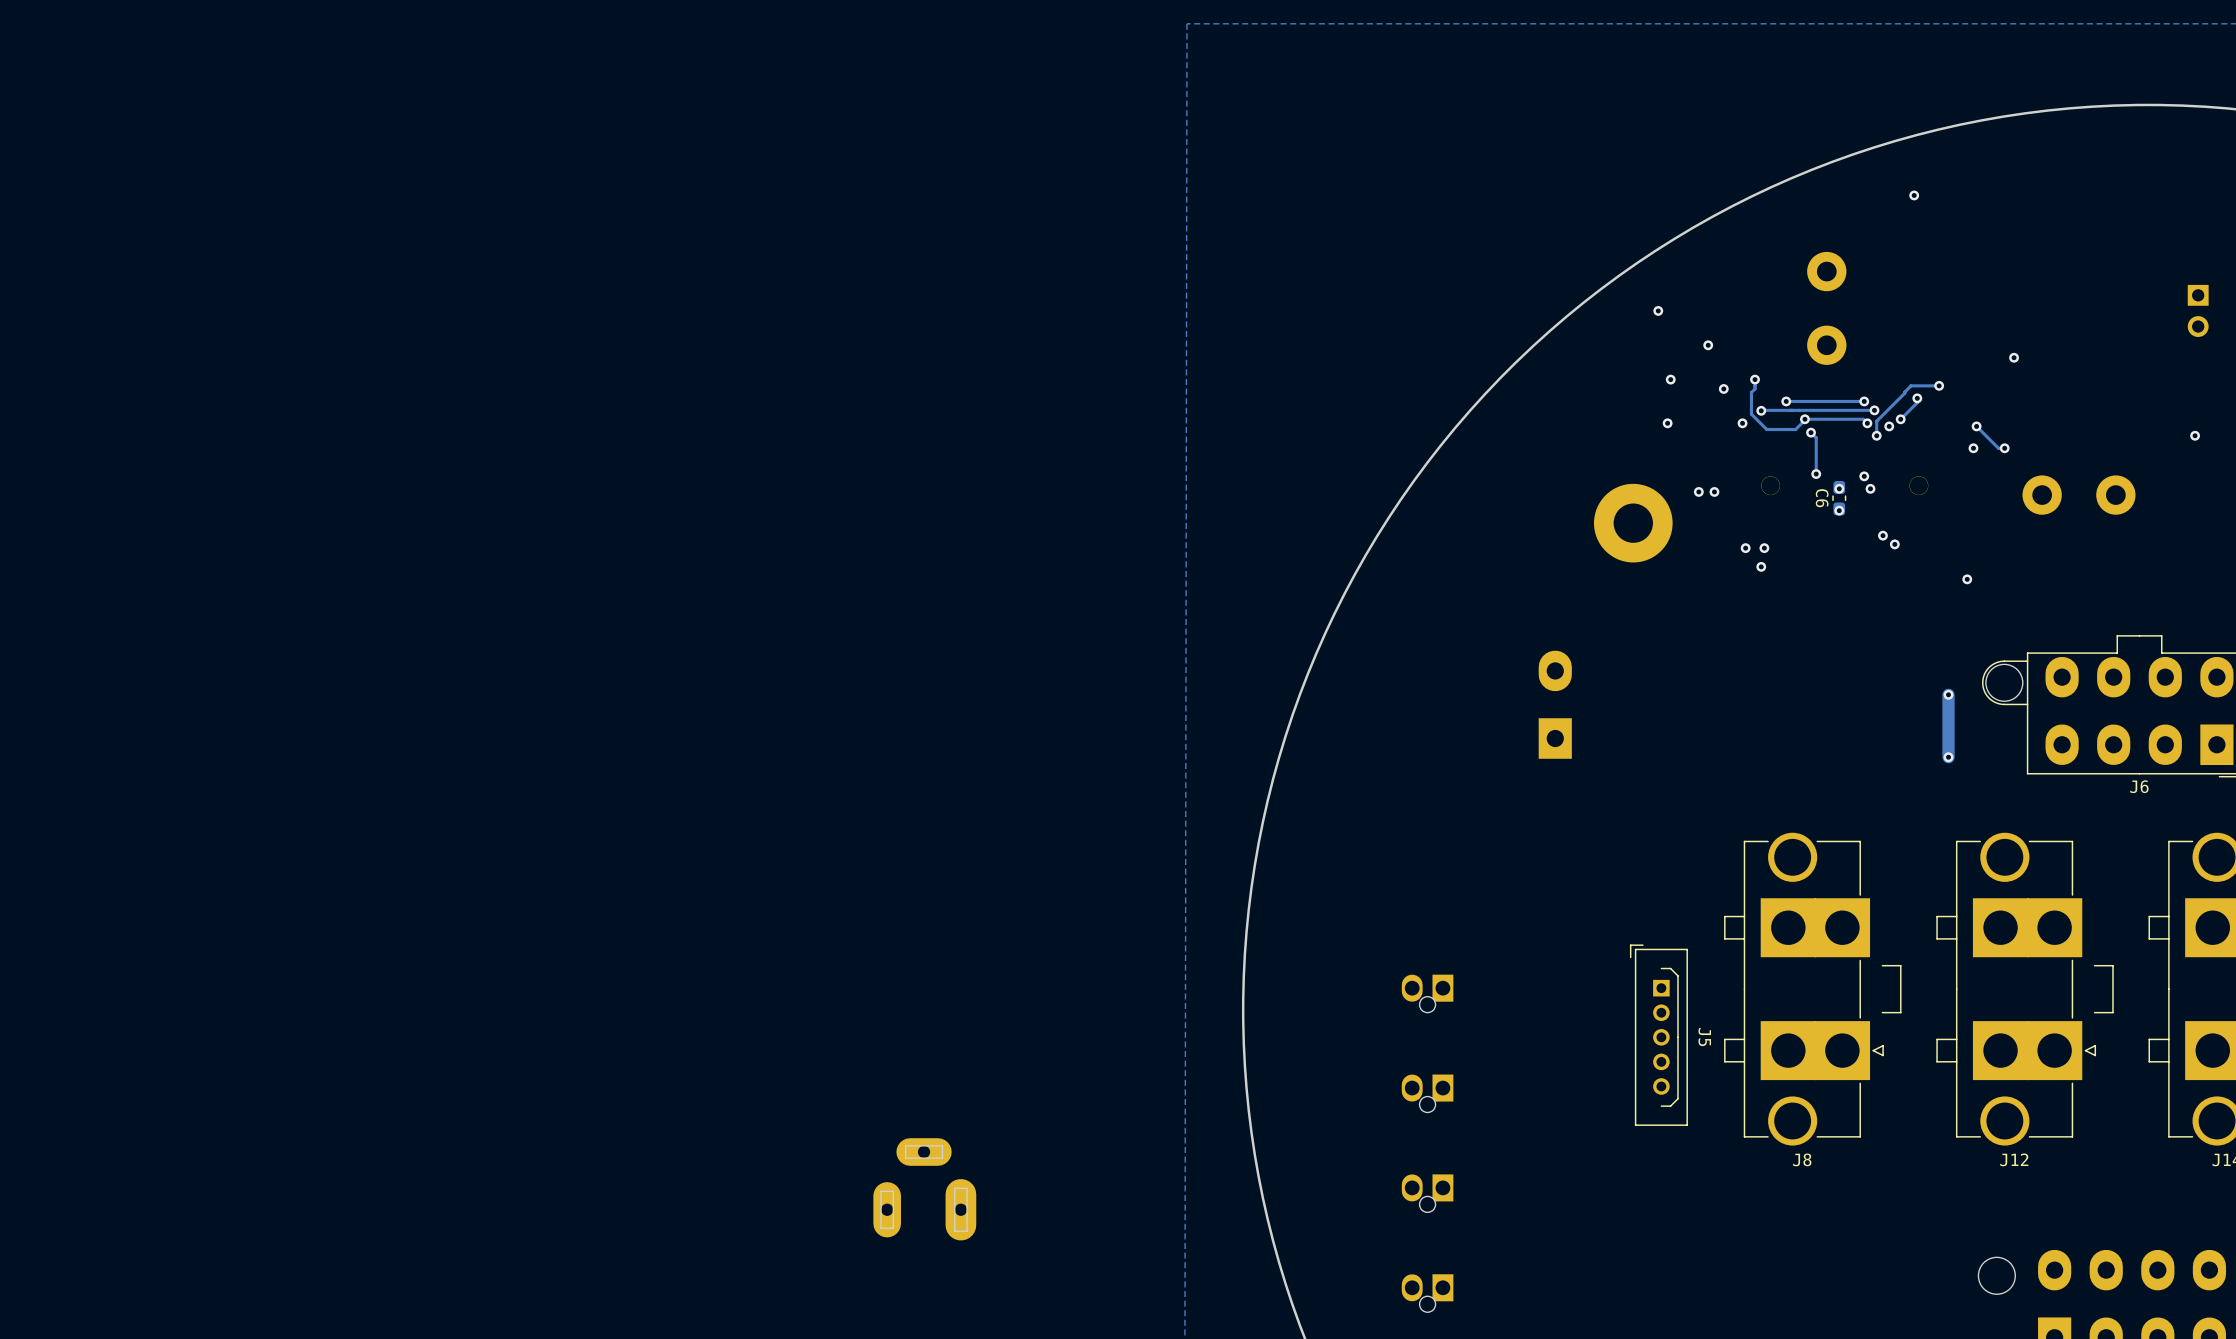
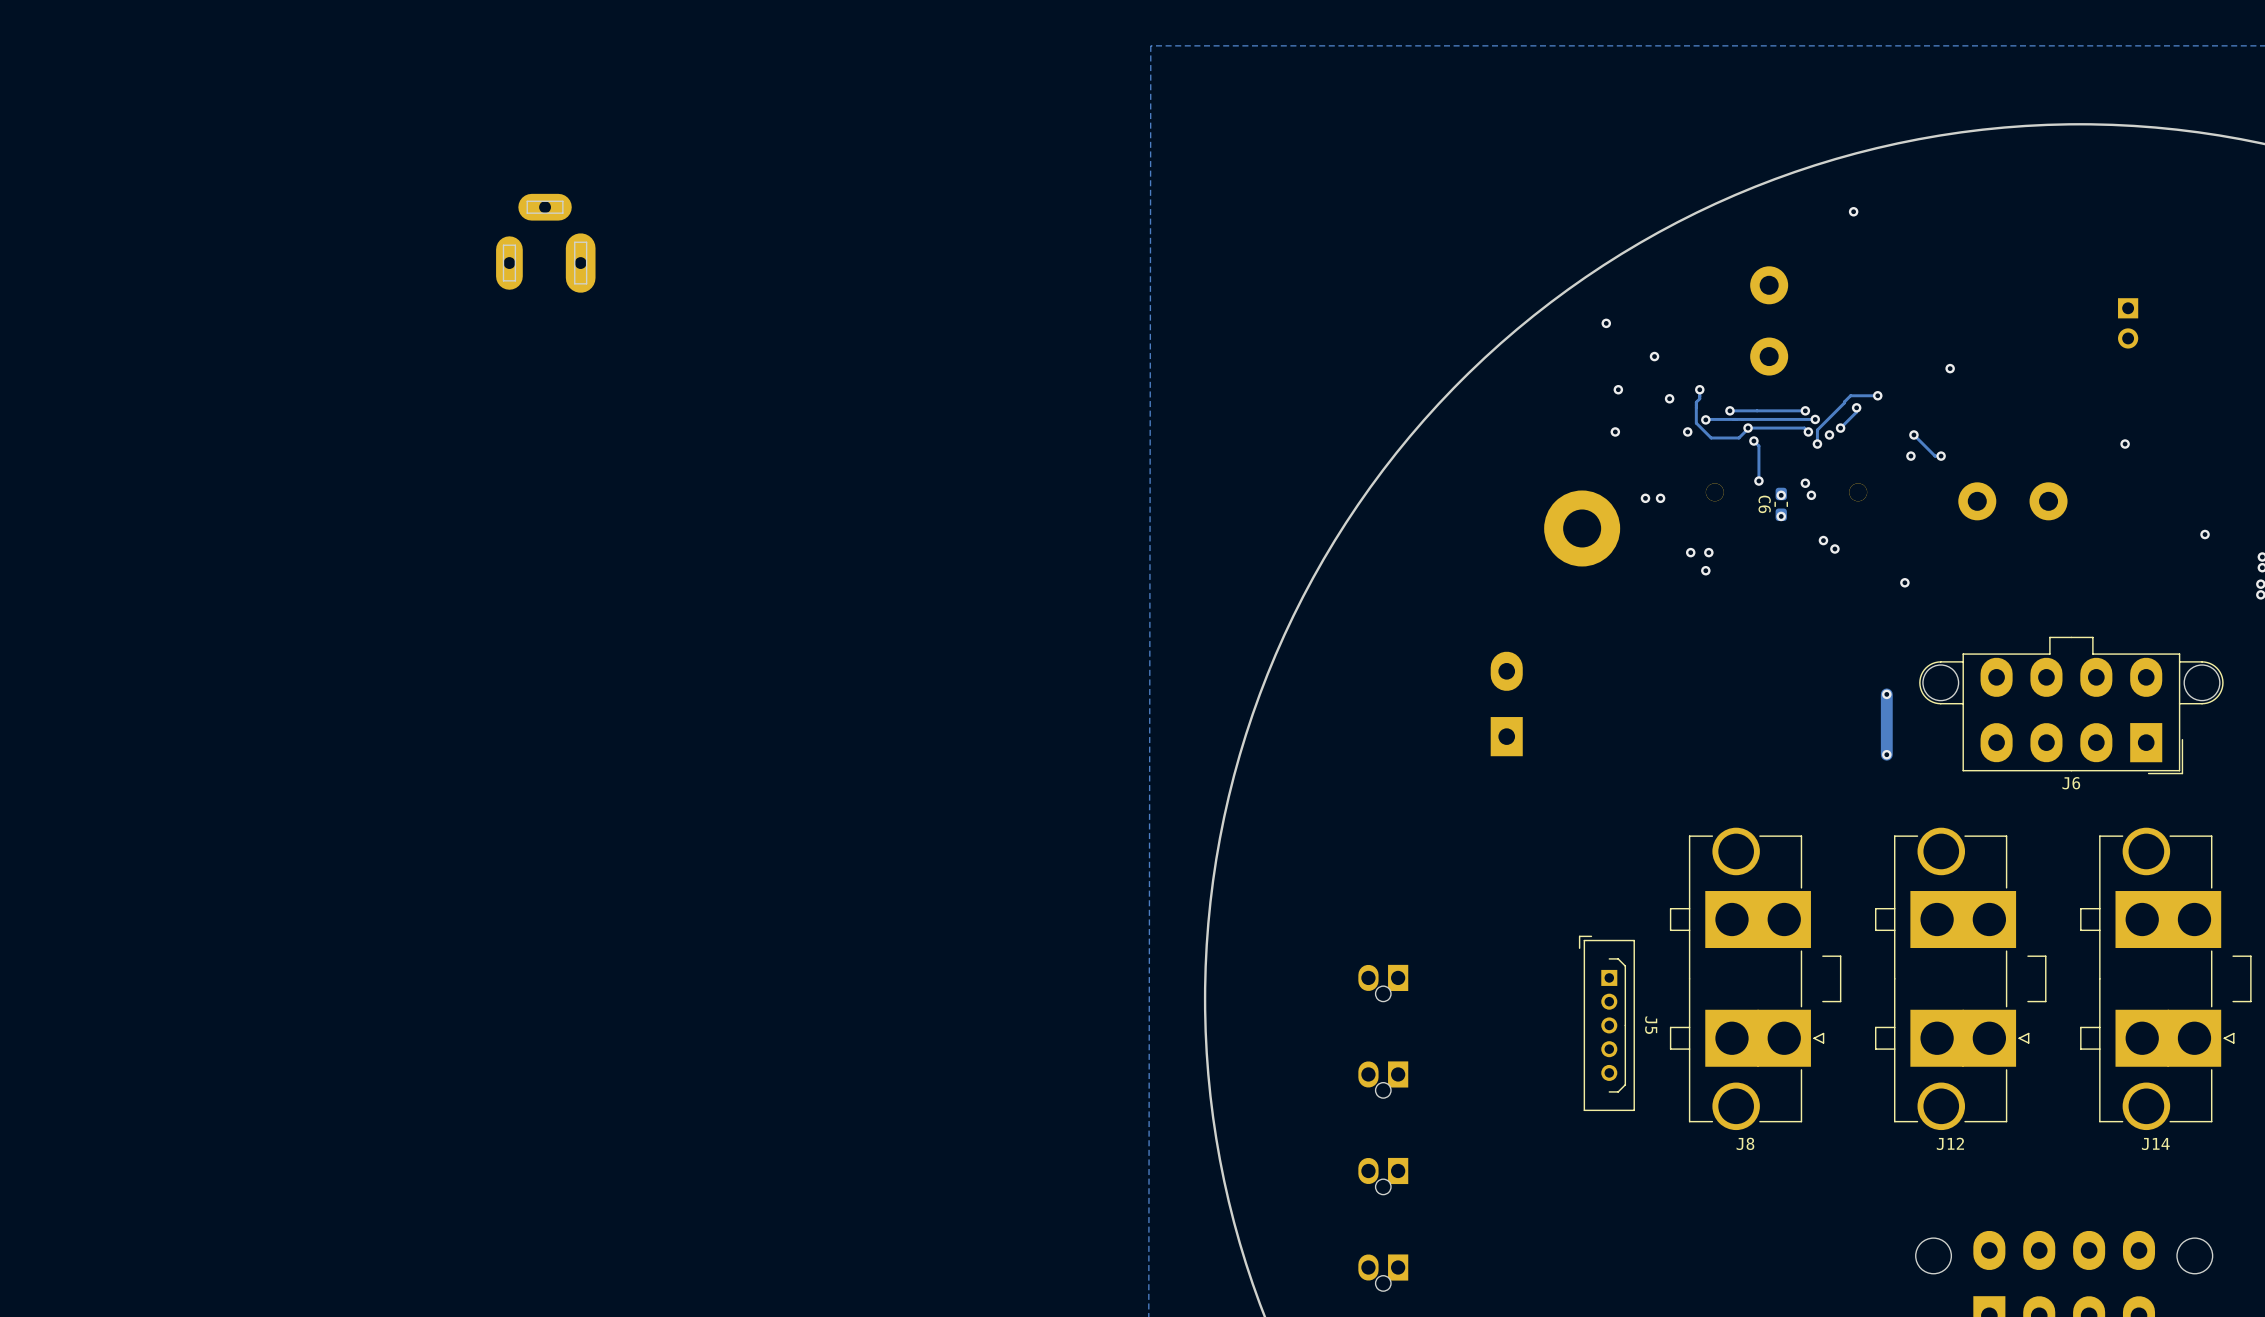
part: none -> (545, 243)
part: (924, 1189) -> none

